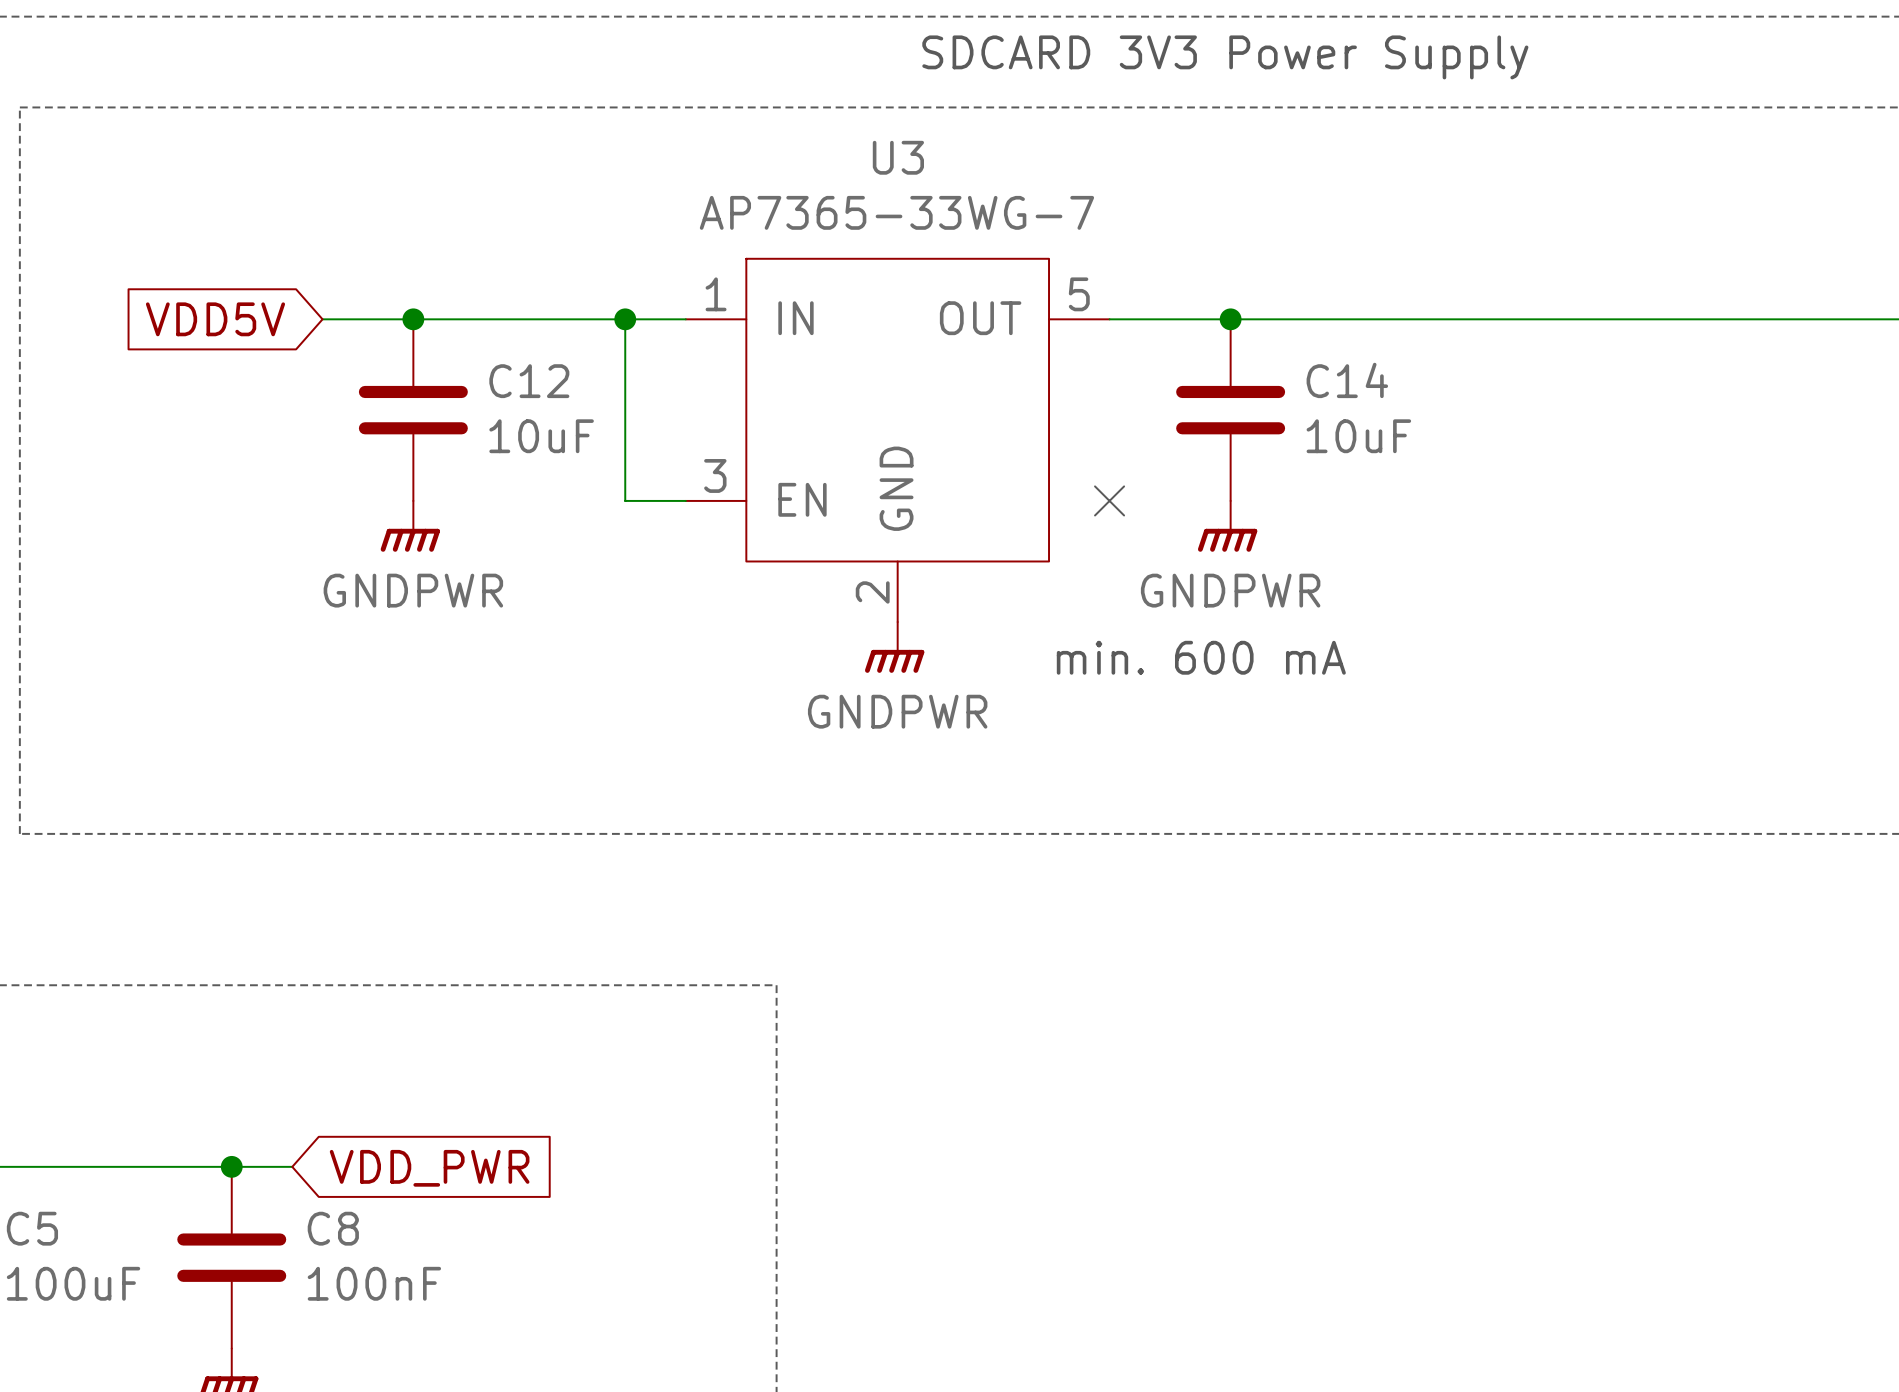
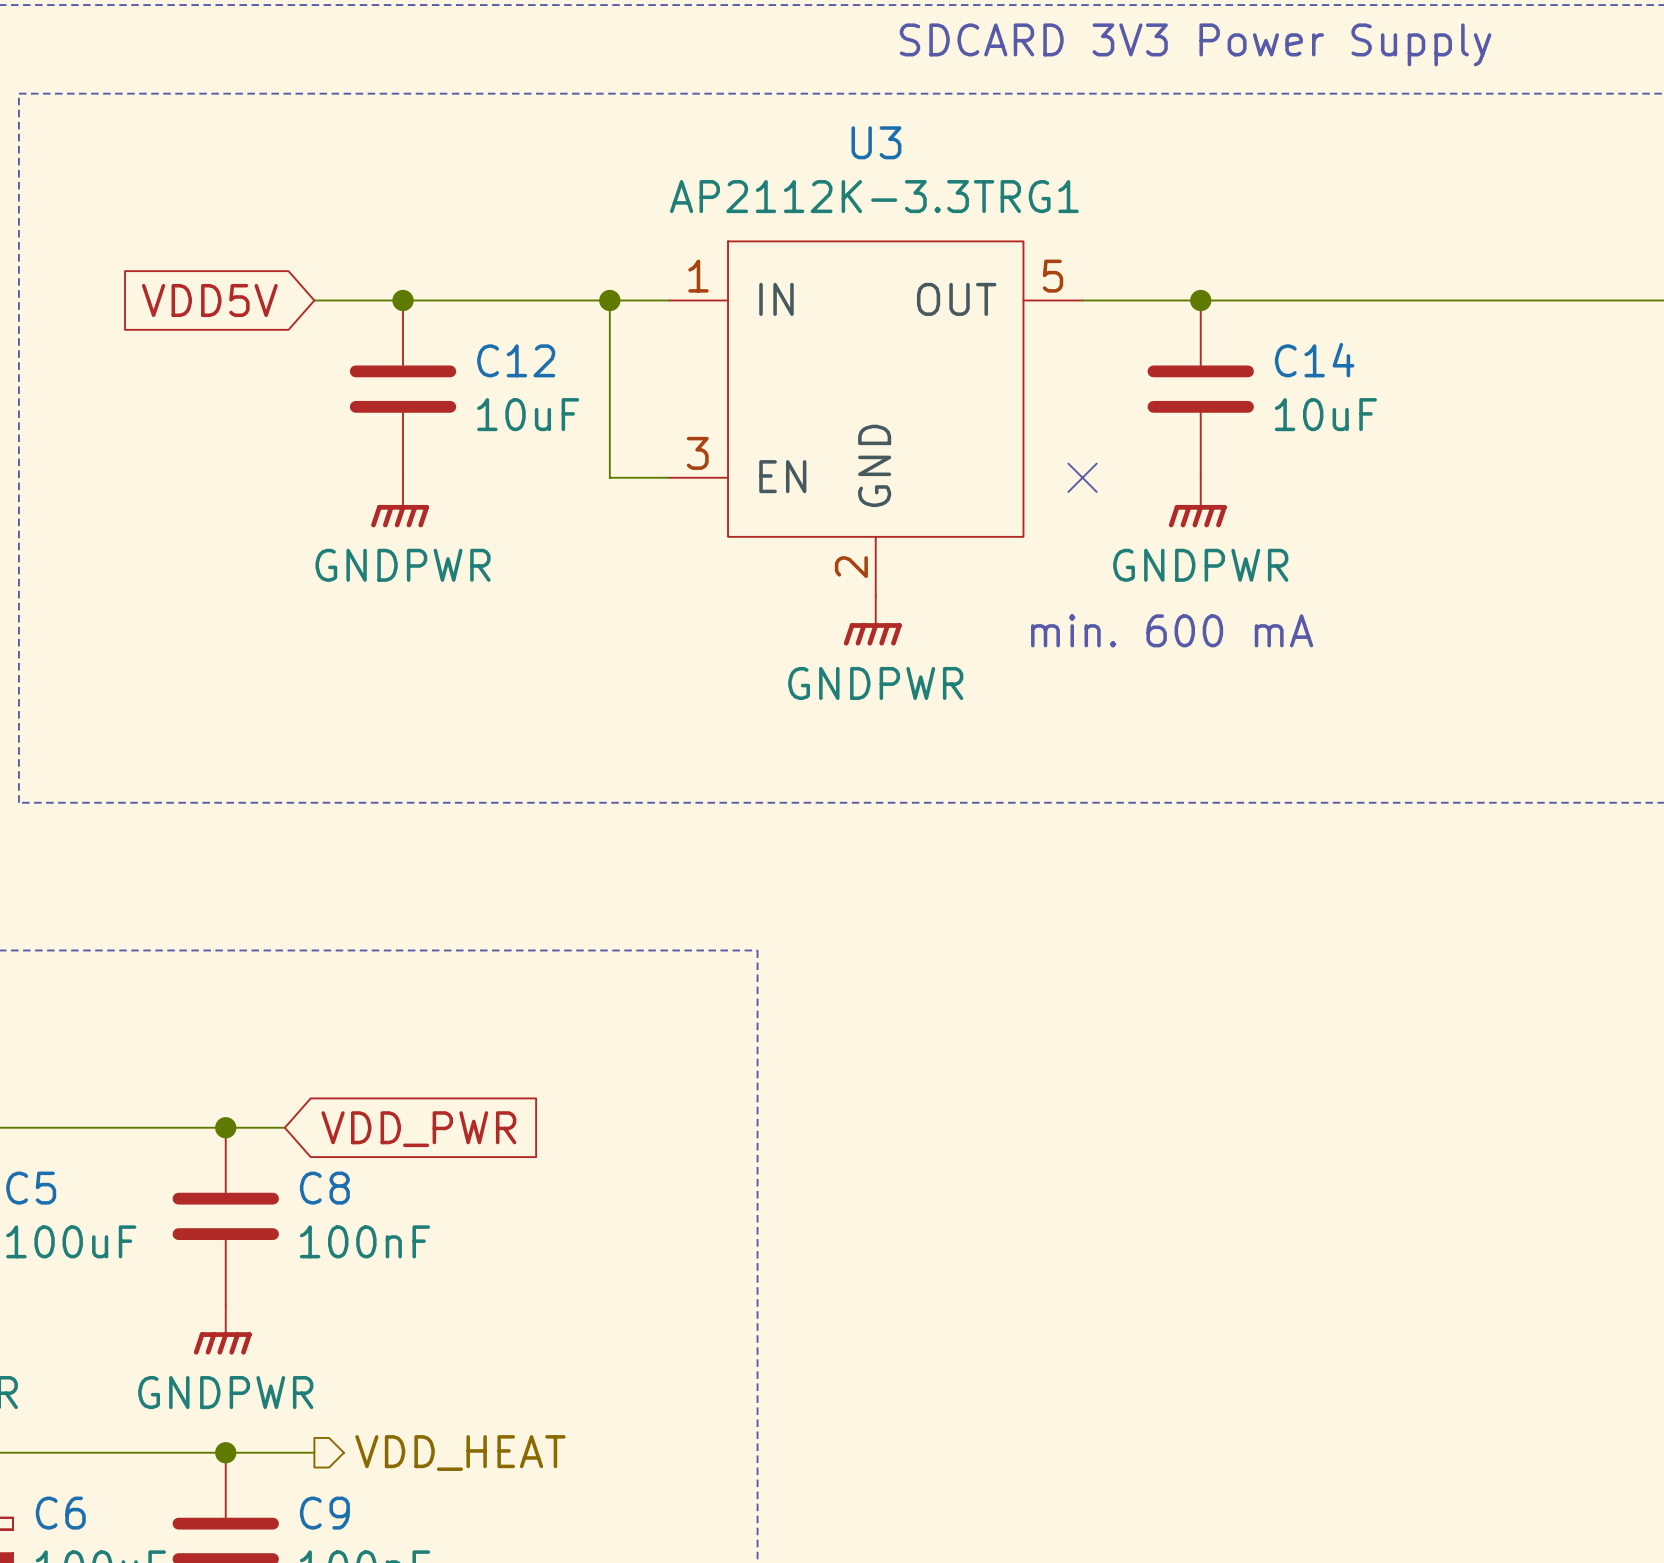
U3 value: AP7365-33WG-7 (896, 212) -> AP2112K-3.3TRG1 (874, 196)

